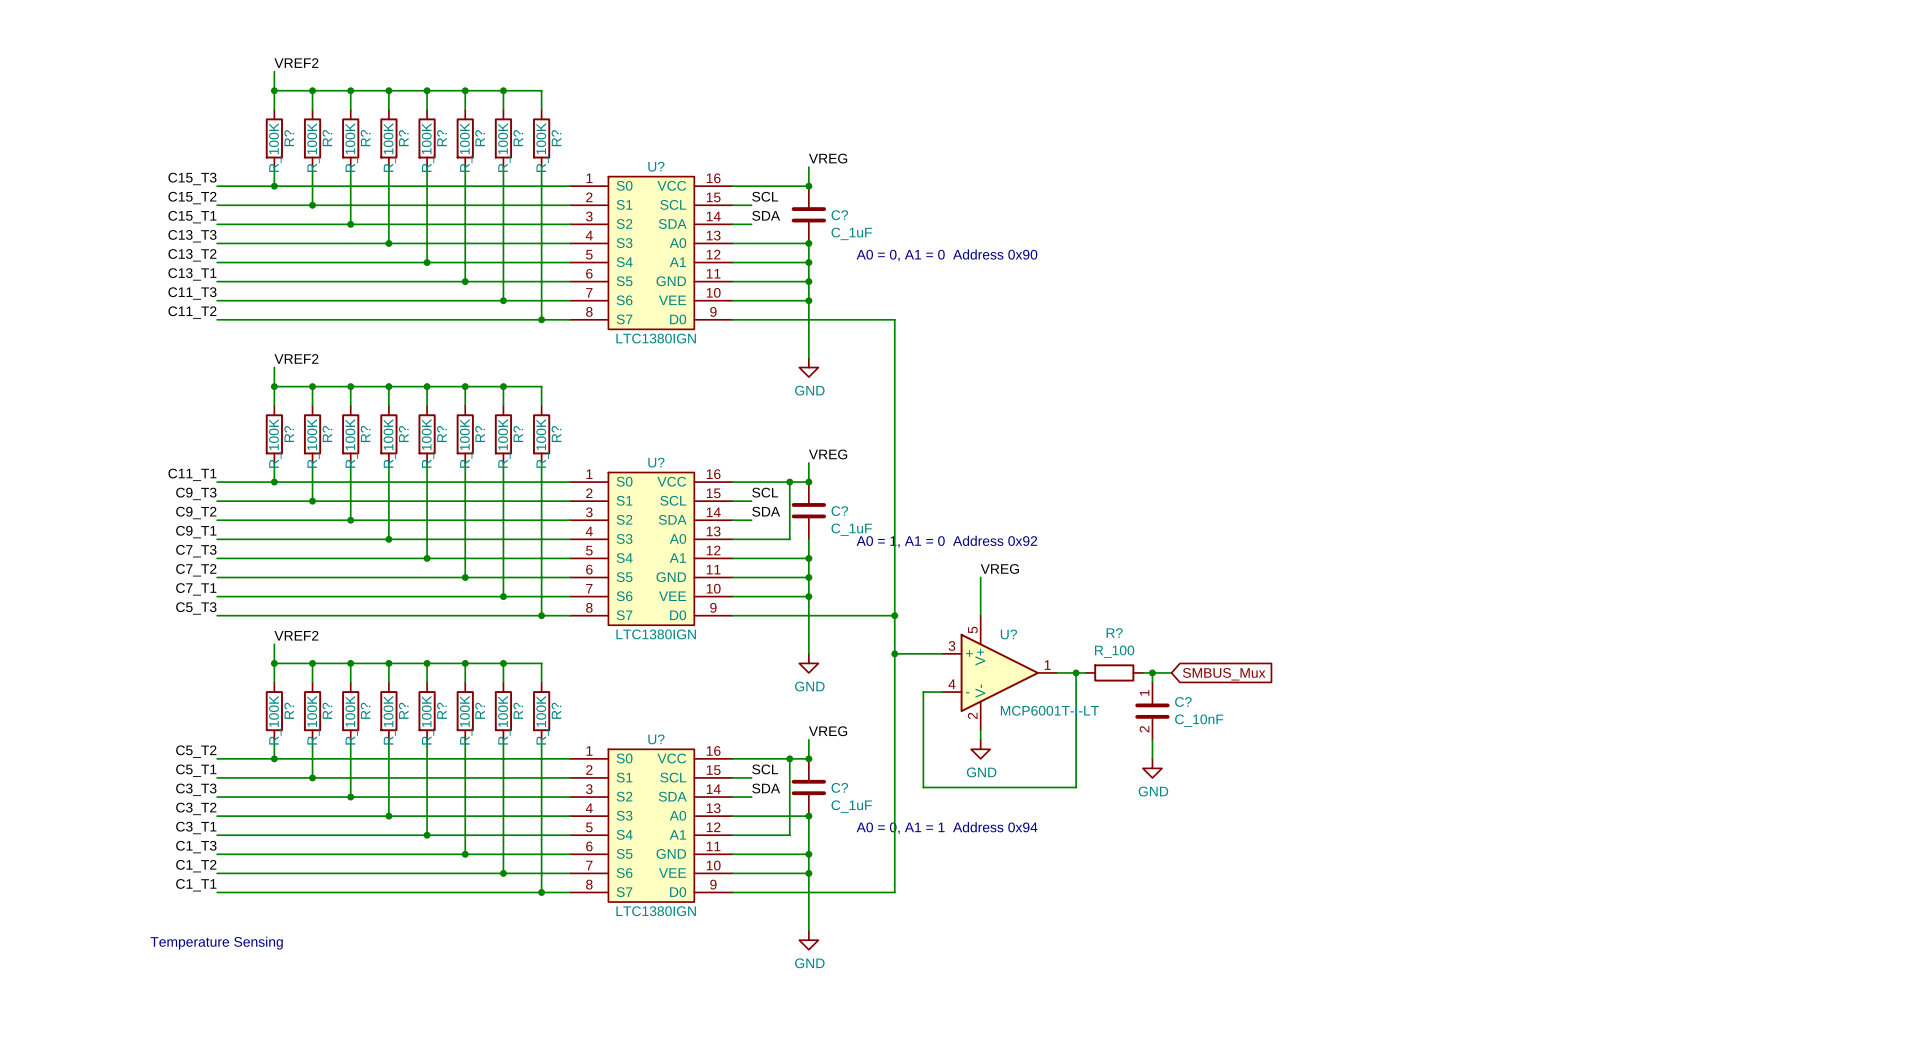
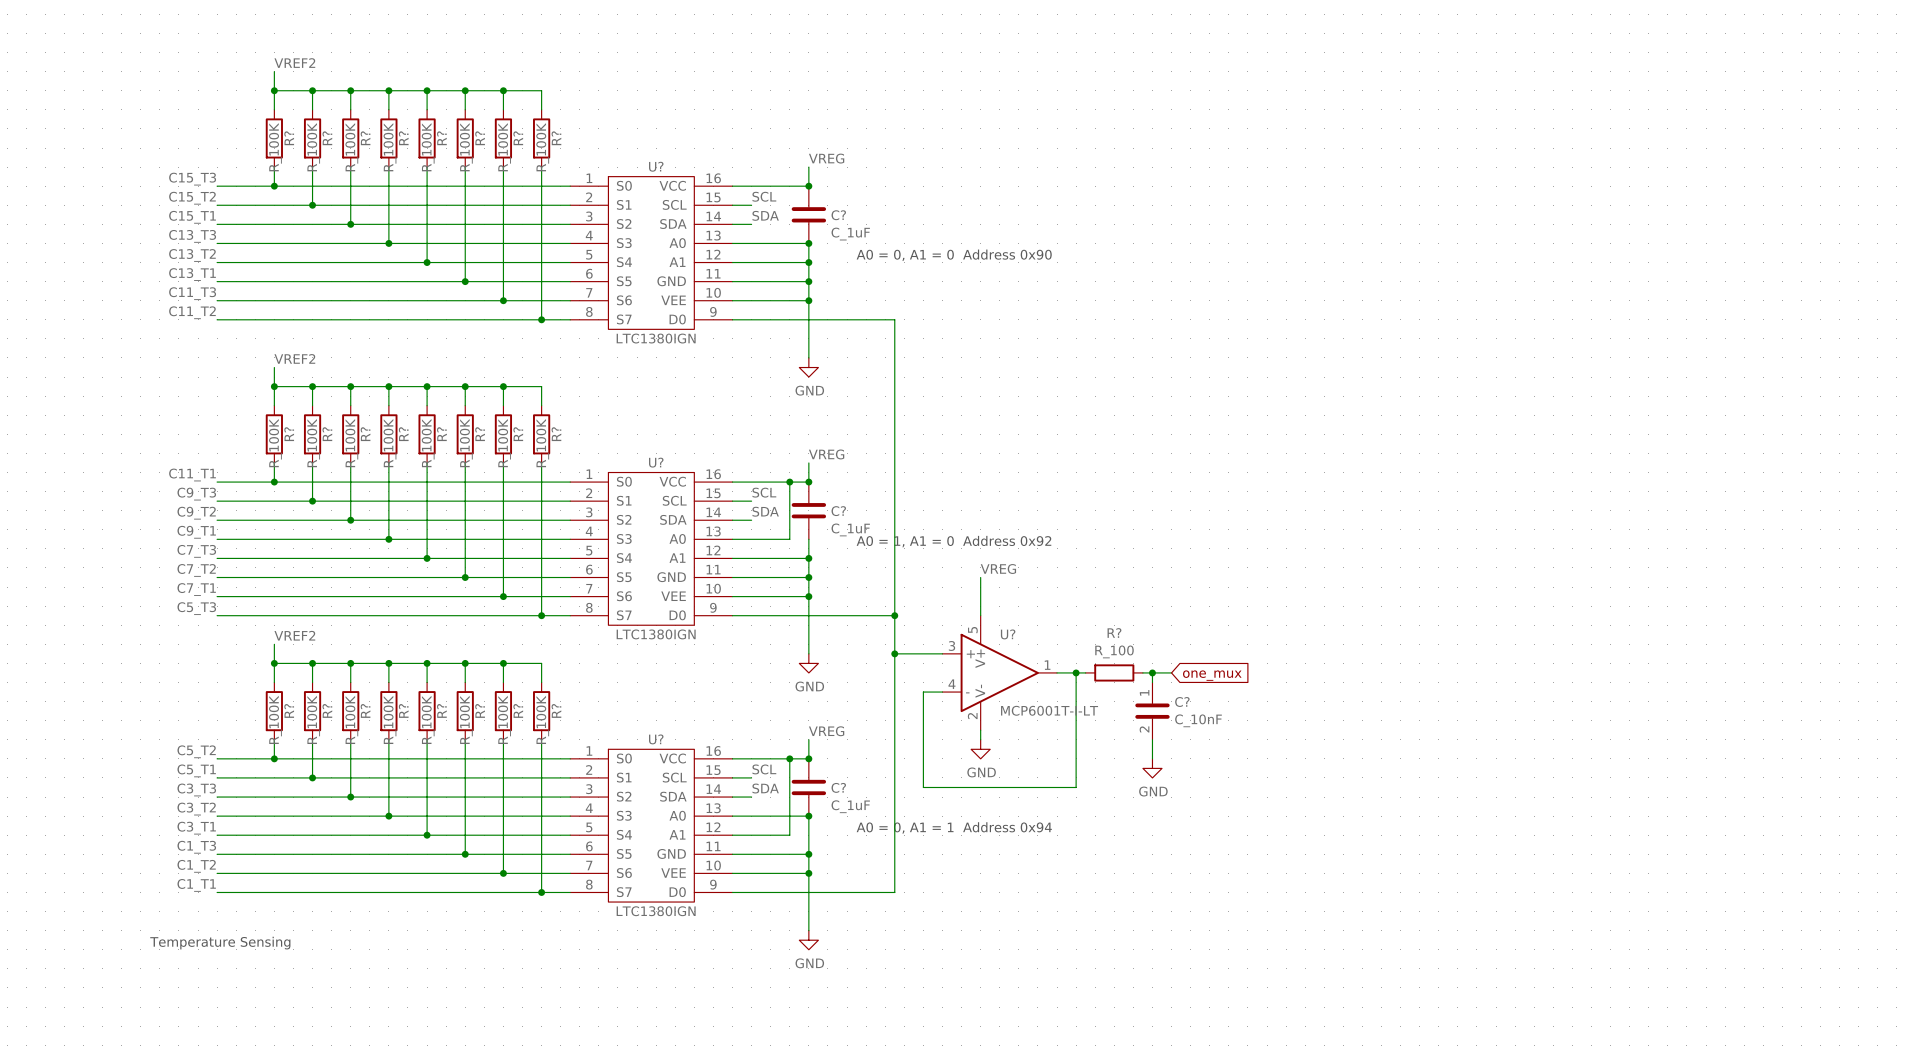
global label: SMBUS_Mux (1224, 674) -> one_mux (1212, 675)

